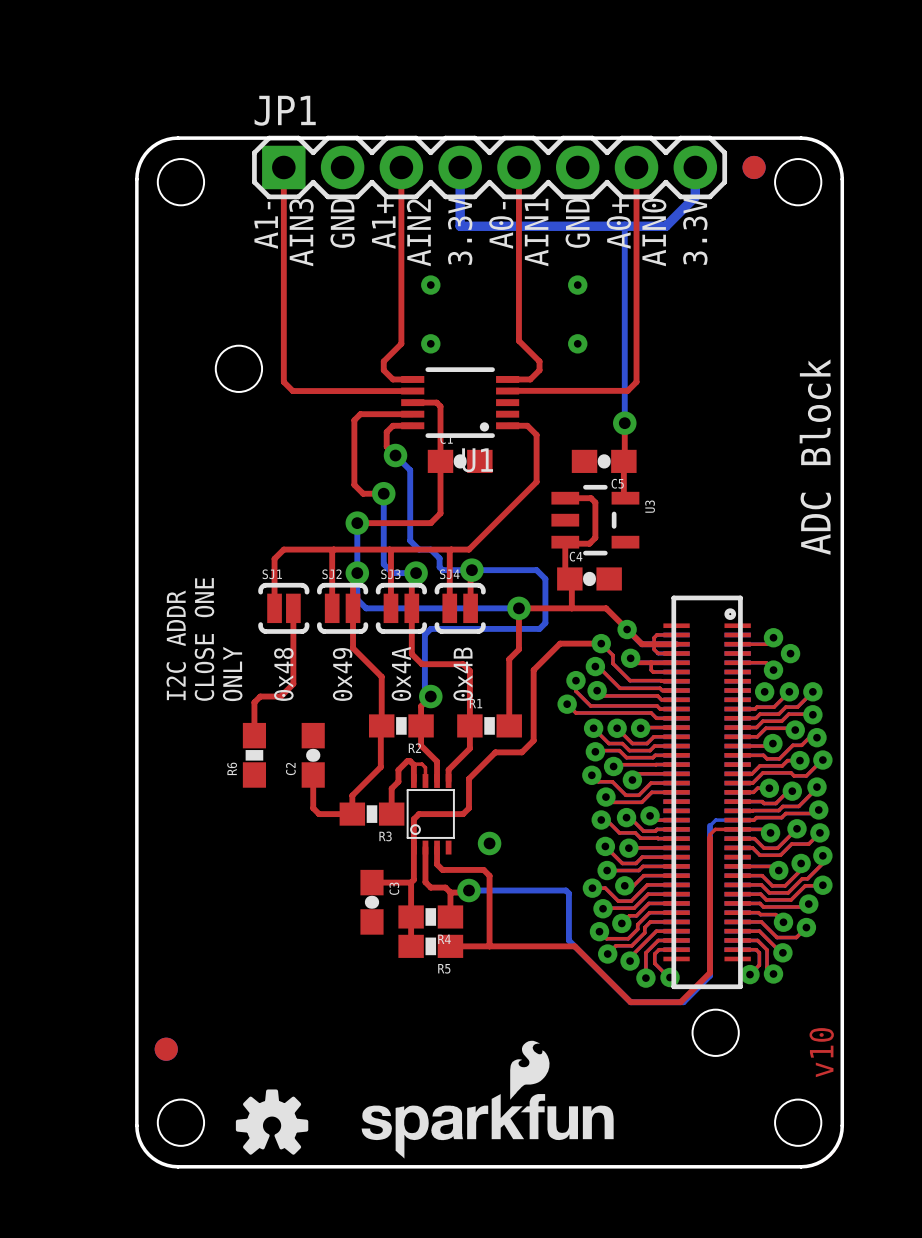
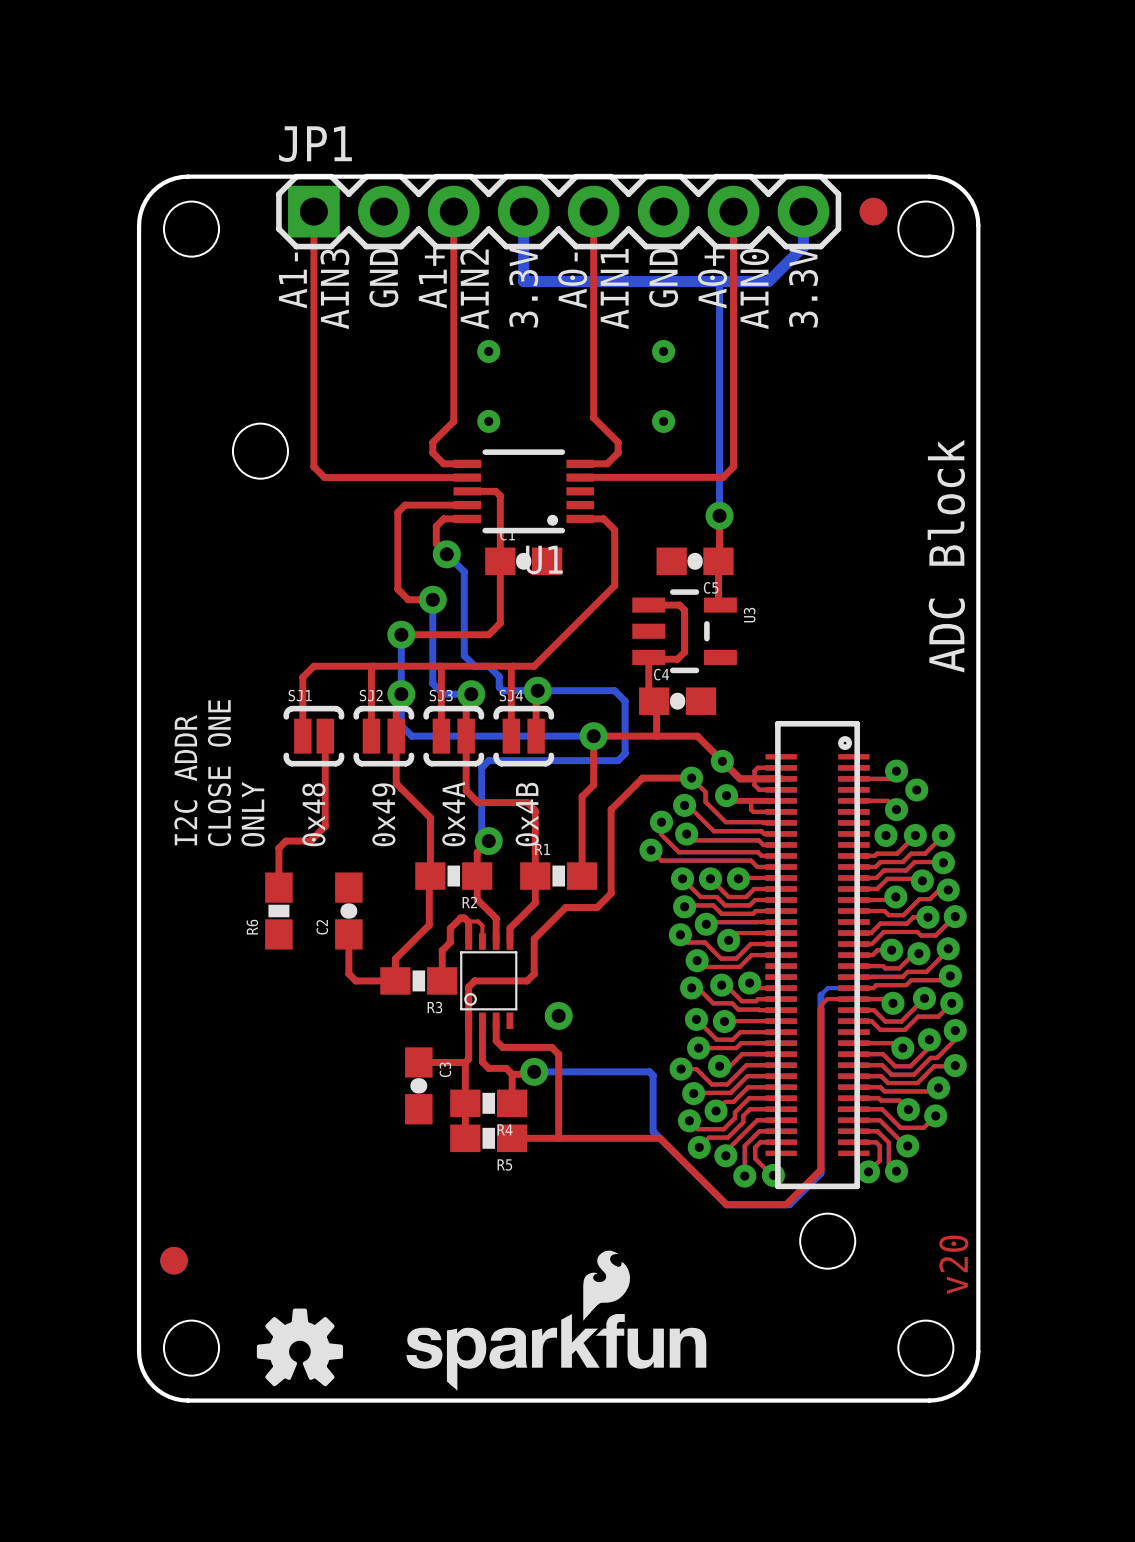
text: v10 (821, 1052) -> v20 (953, 1264)

